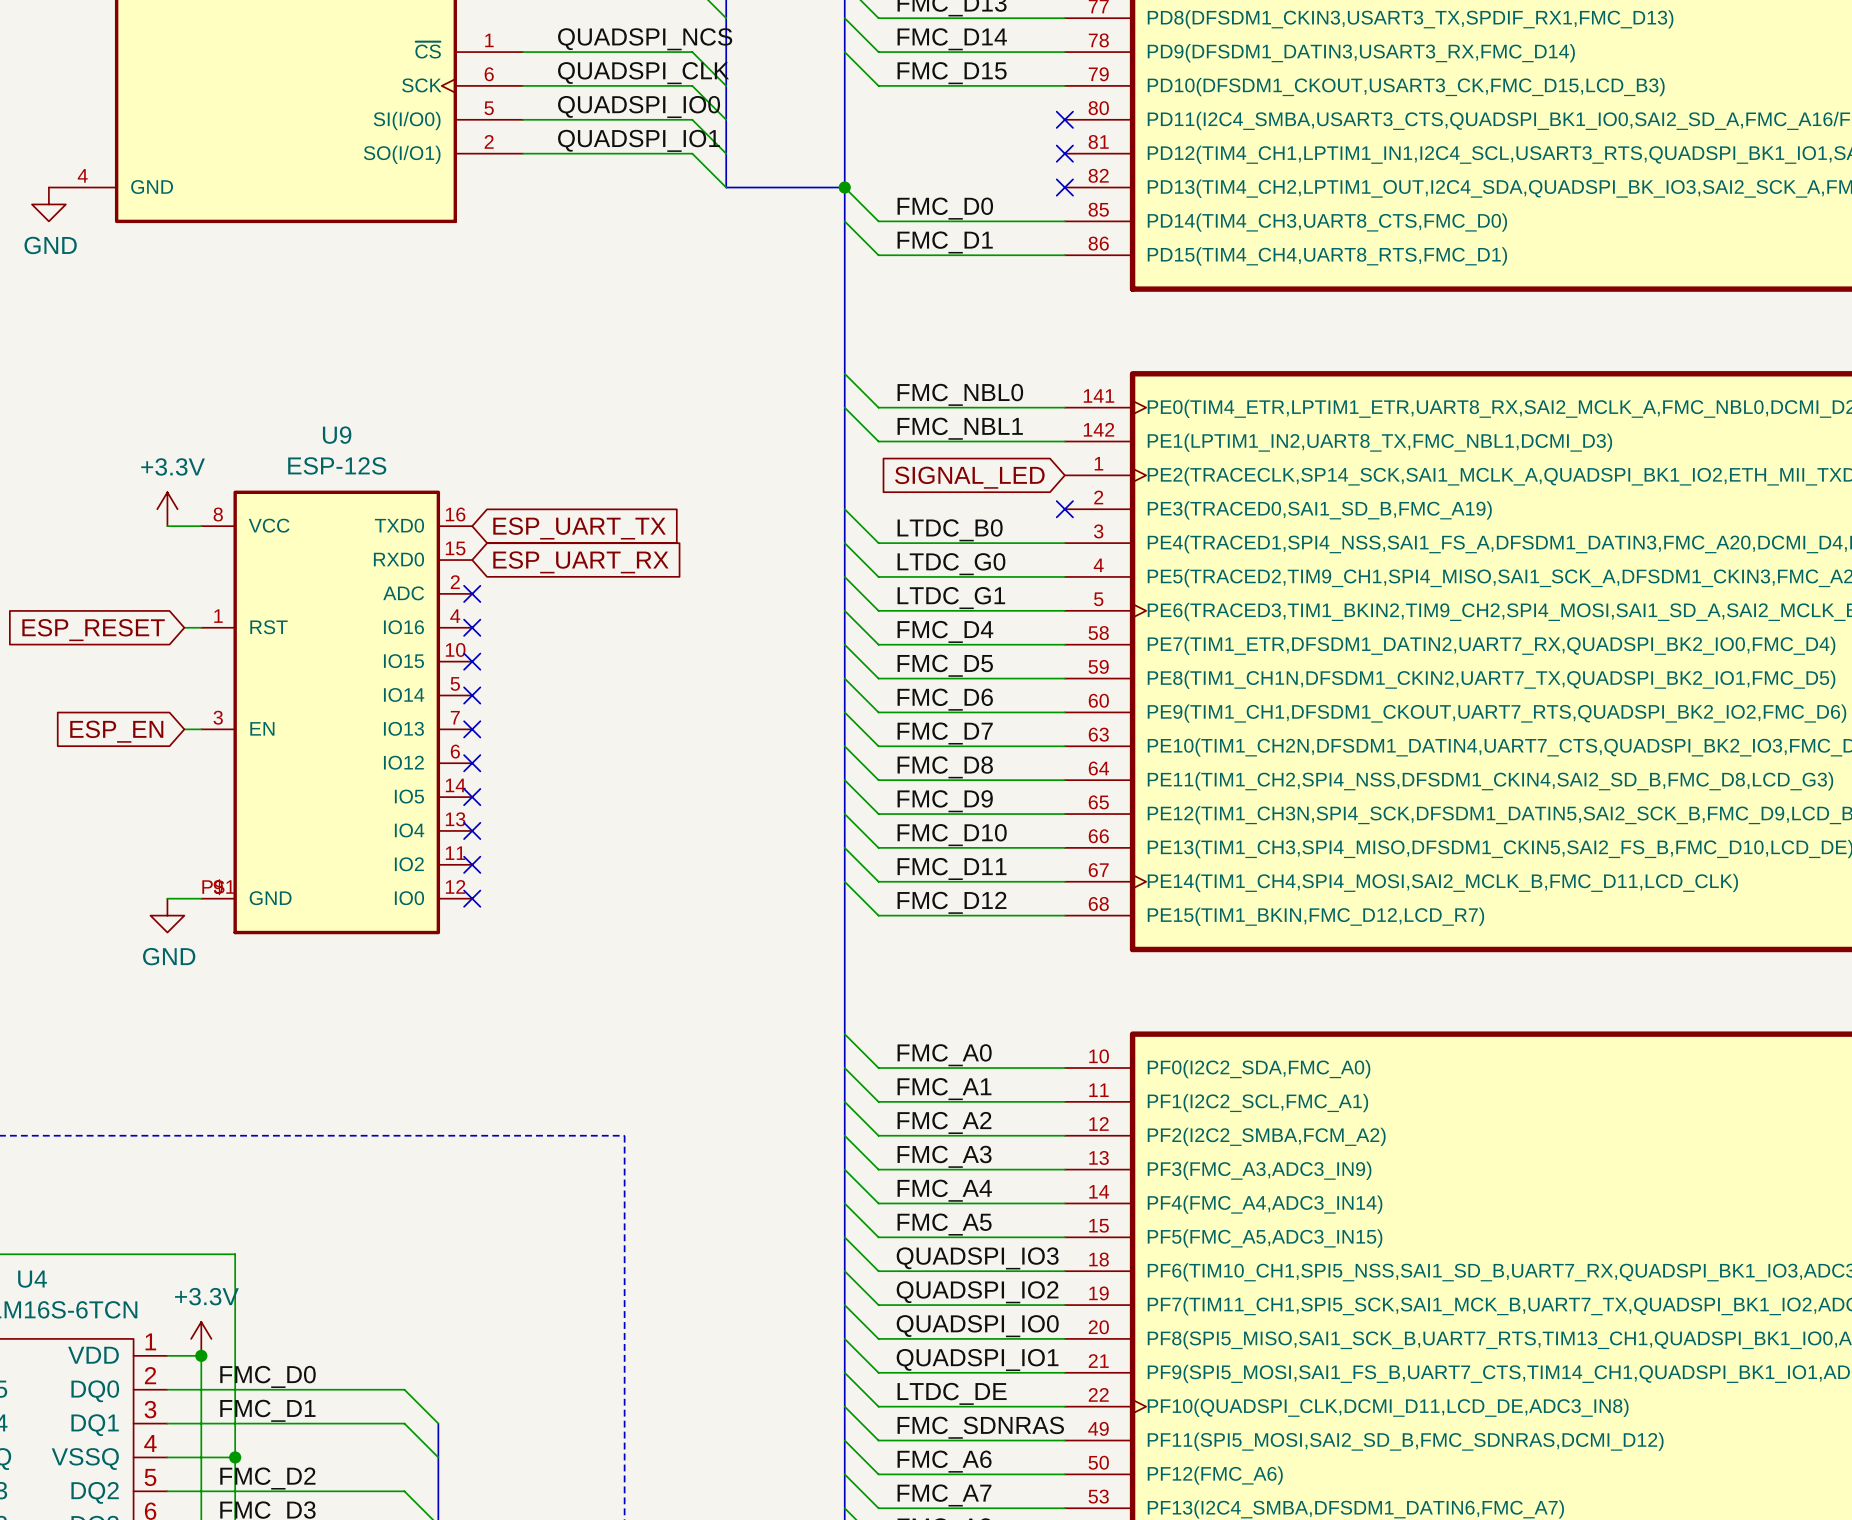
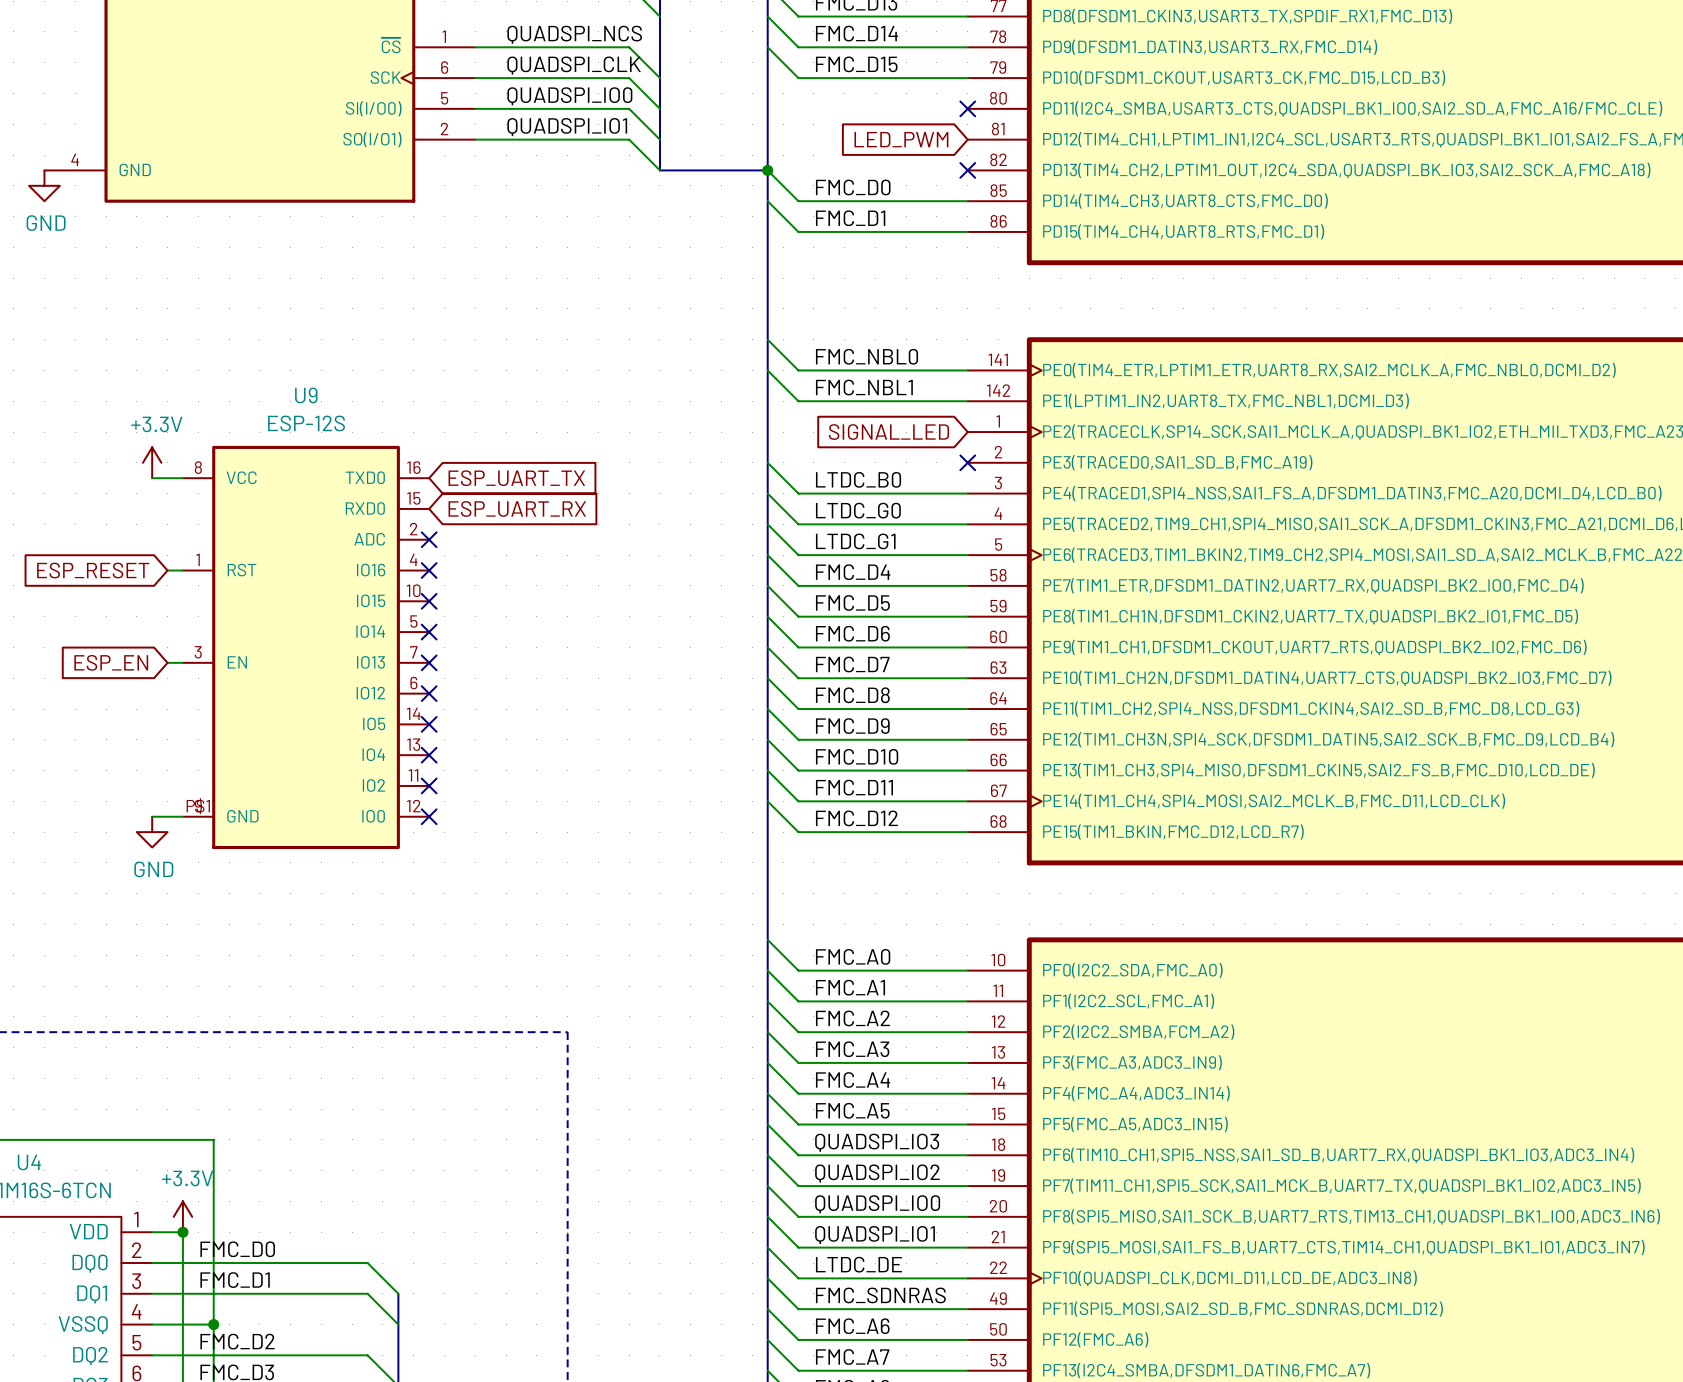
no-connect mark: (1064, 153) -> none
global label: none -> LED_PWM (901, 139)

